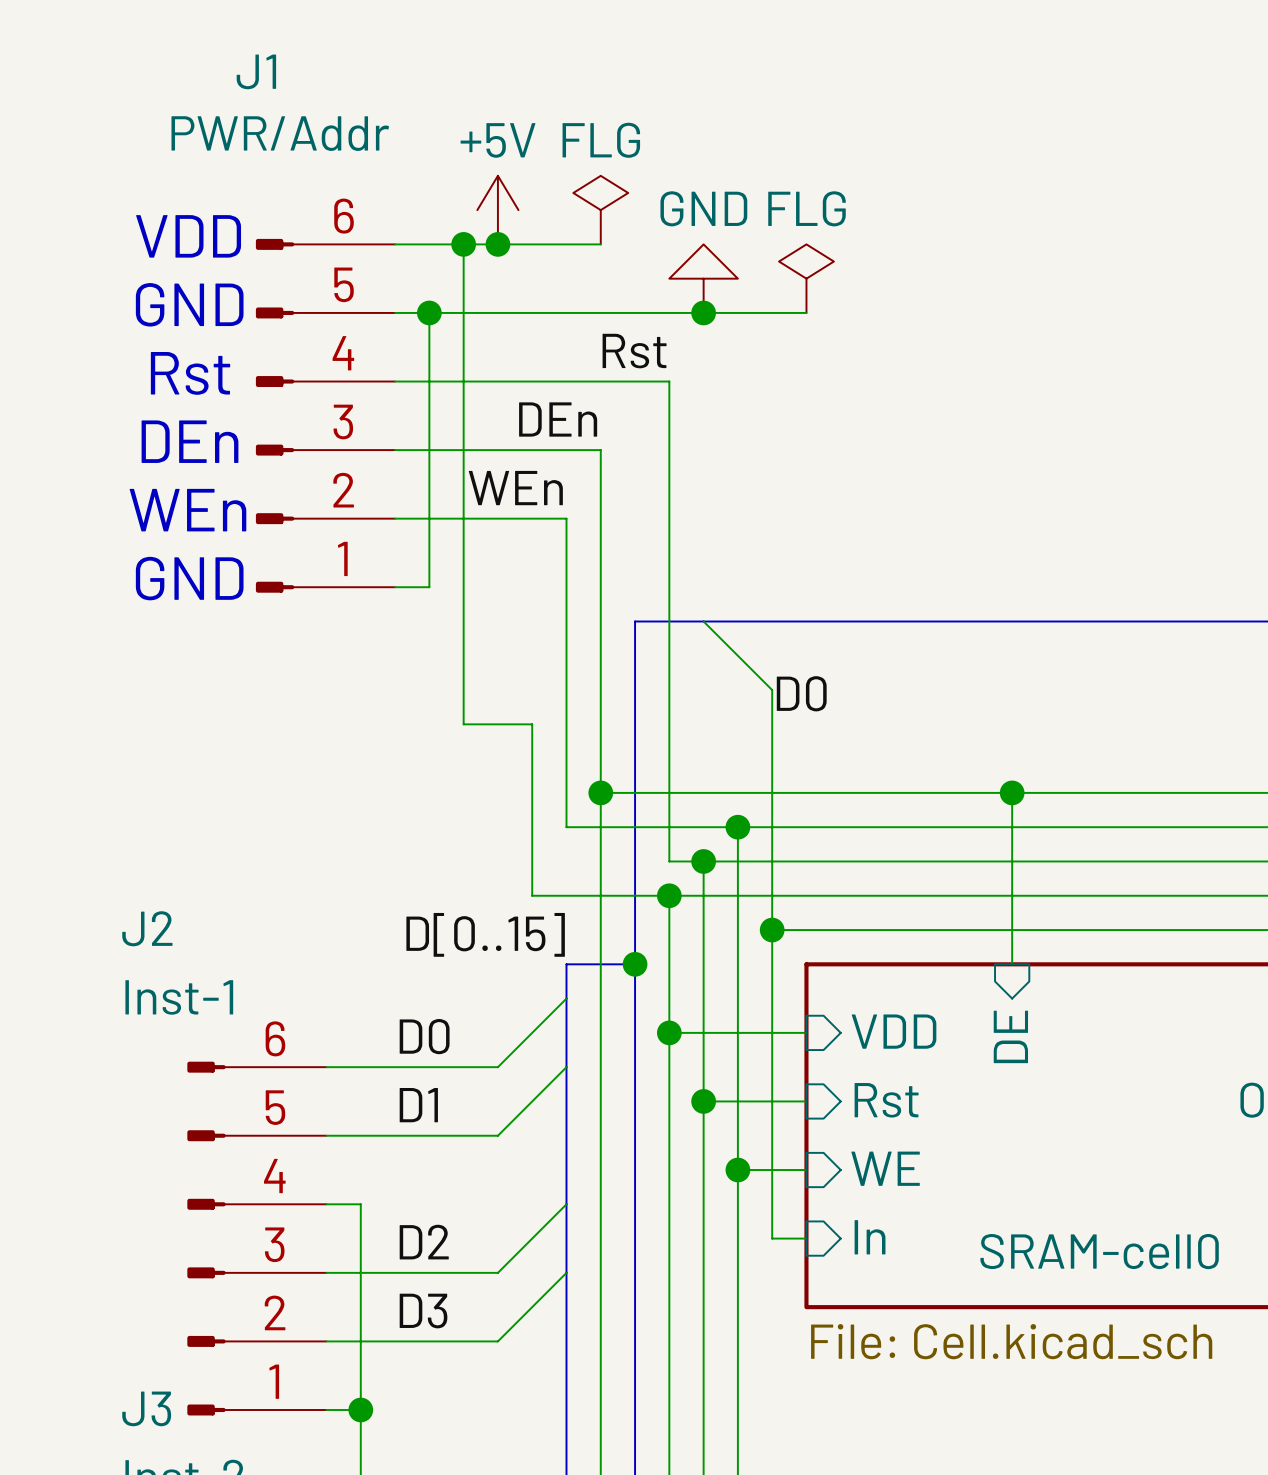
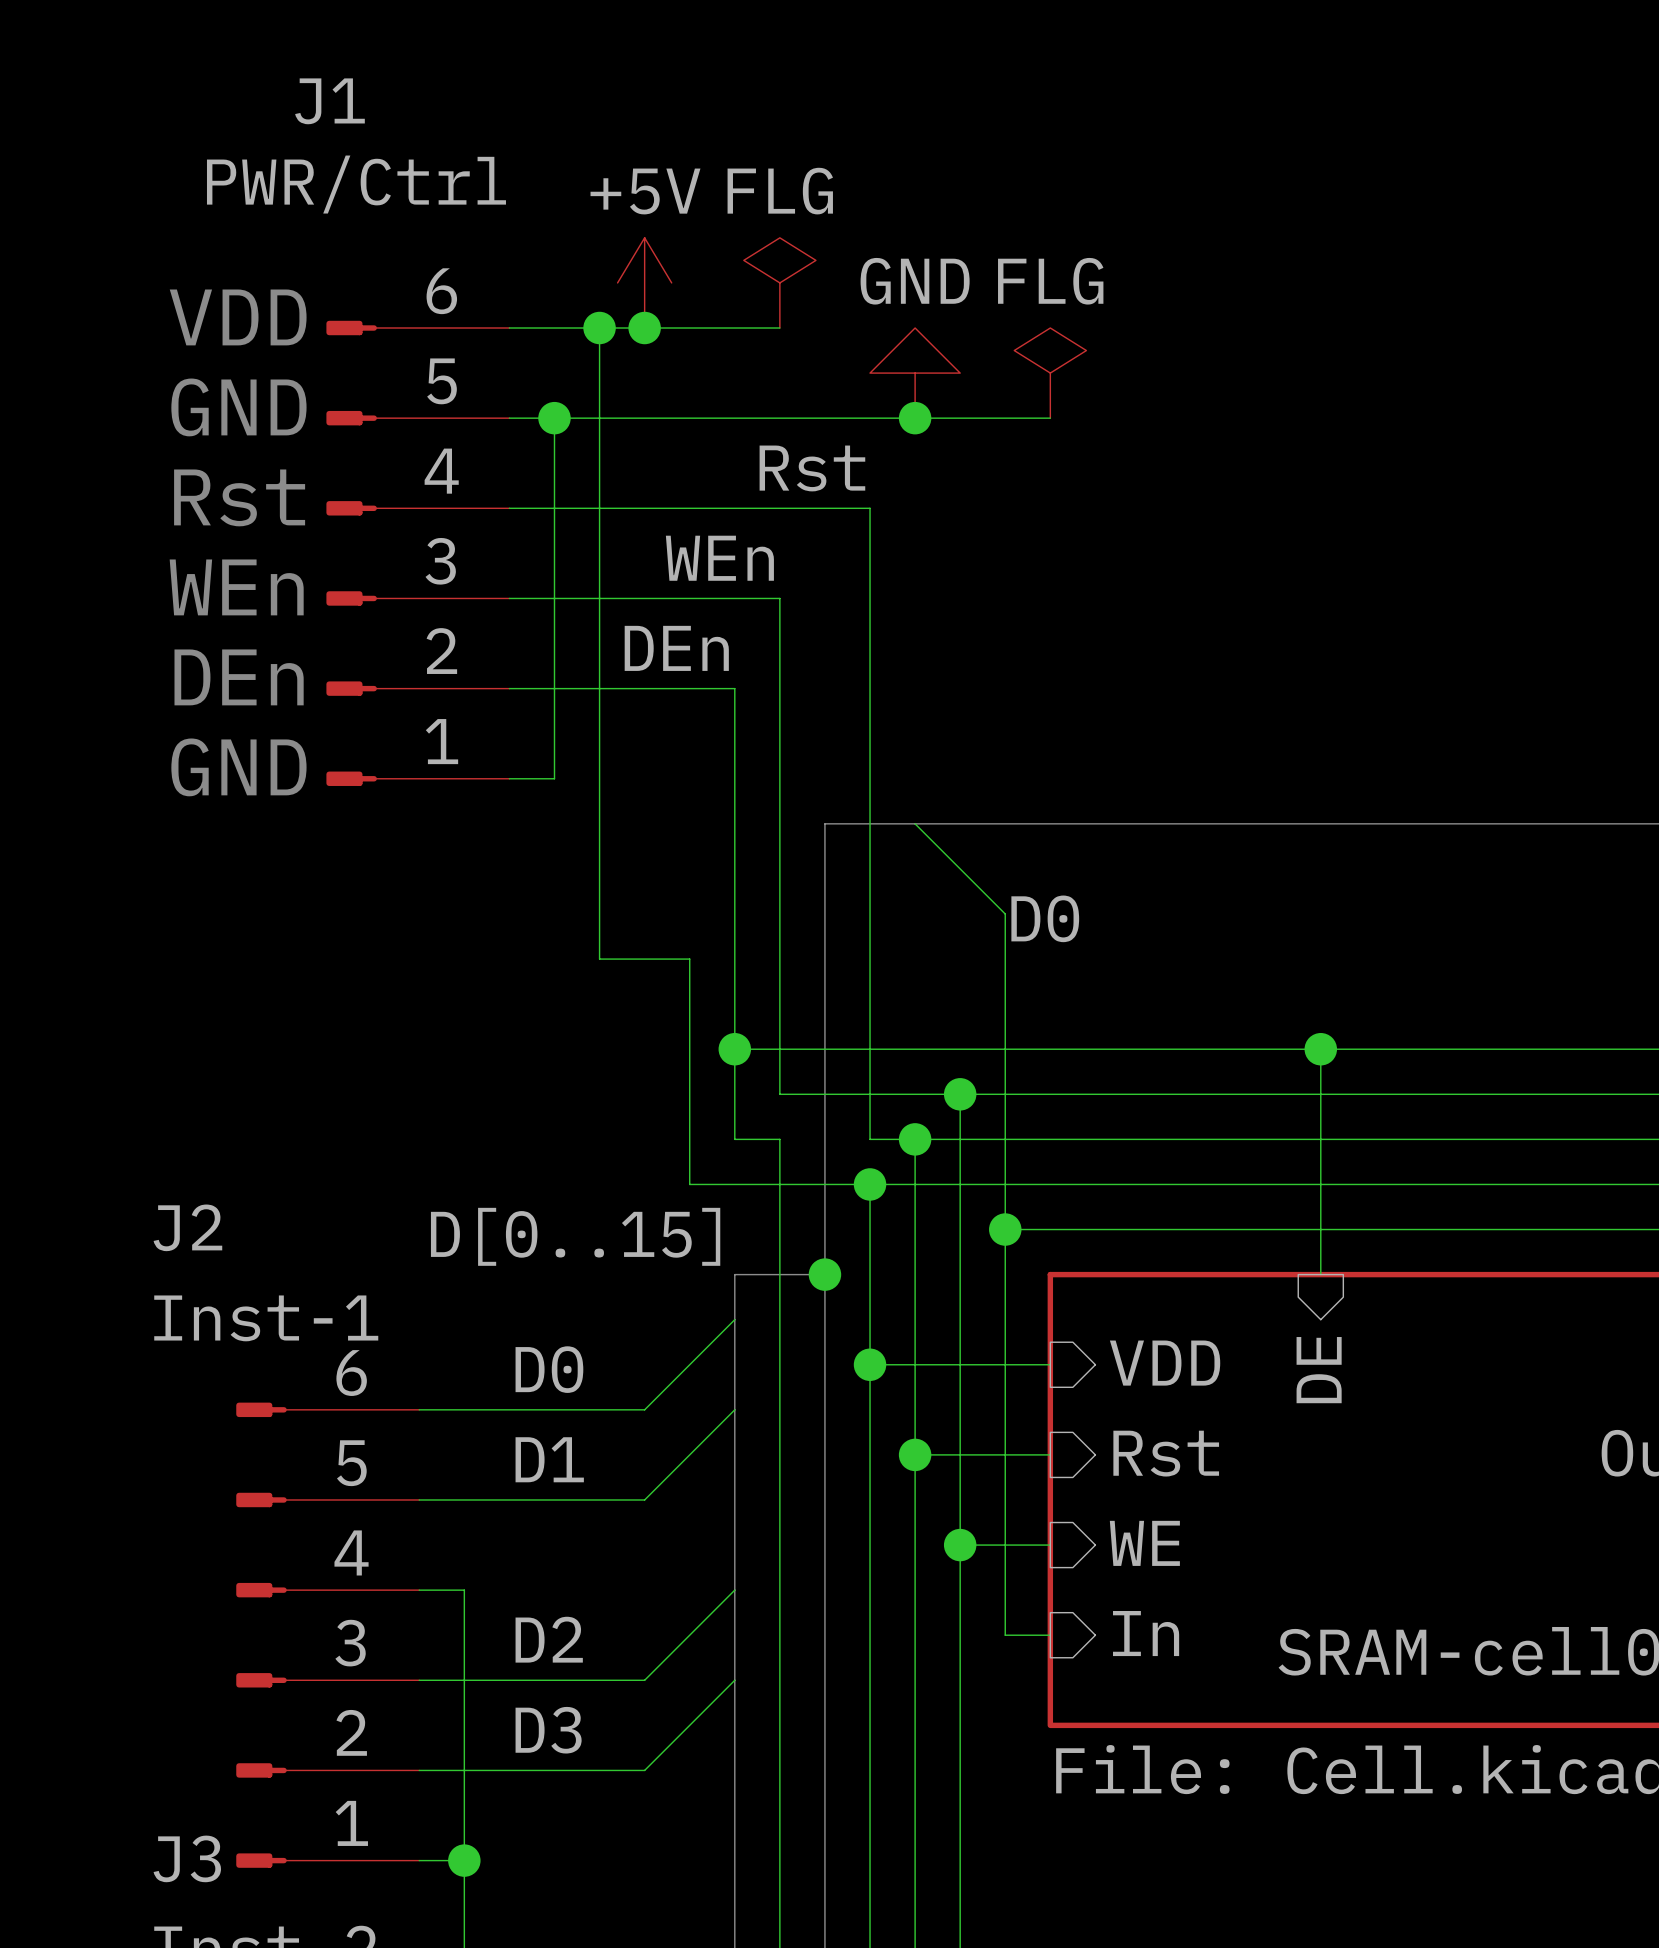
J1 value: PWR/Addr (280, 133) -> PWR/Ctrl (356, 184)
label: DEn (558, 419) -> WEn (719, 558)
text: DEn (190, 441) -> WEn (236, 587)
label: WEn (515, 488) -> DEn (676, 648)
text: WEn (187, 510) -> DEn (239, 677)
wire: none -> (734, 1049) (779, 1049)
junction position: (600, 792) -> (734, 1049)
wire: (566, 827) (600, 827) (600, 861) -> (734, 1094) (734, 1139) (779, 1139)

